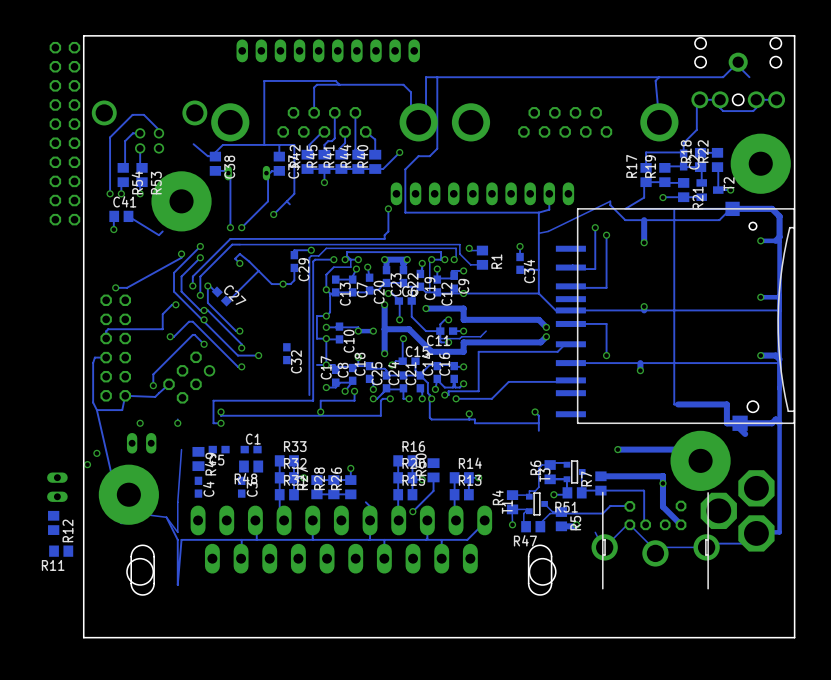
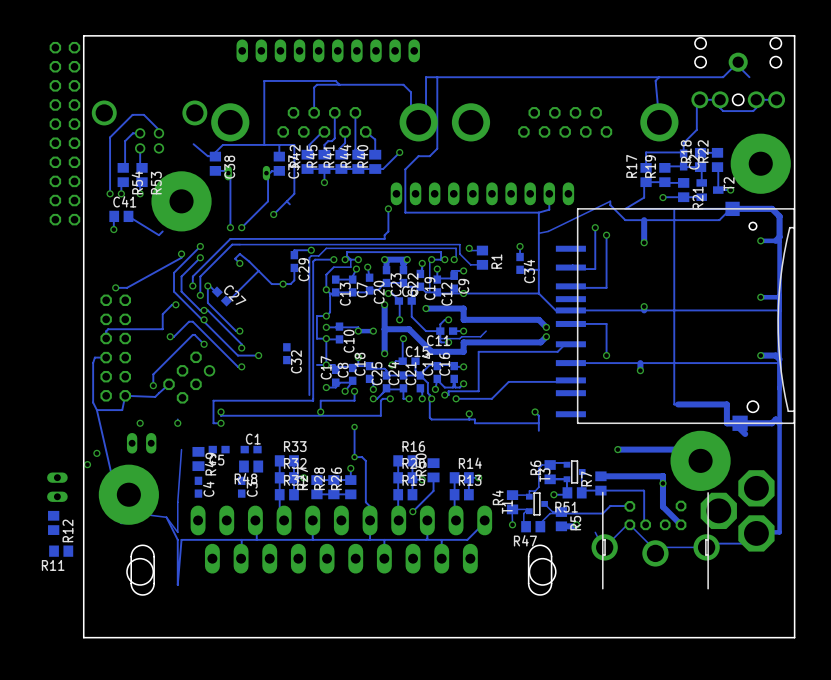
track: none -> (354, 427) (354, 457) (362, 457) (365, 460) (365, 502)
via: none -> (354, 427)
via: none -> (354, 457)

